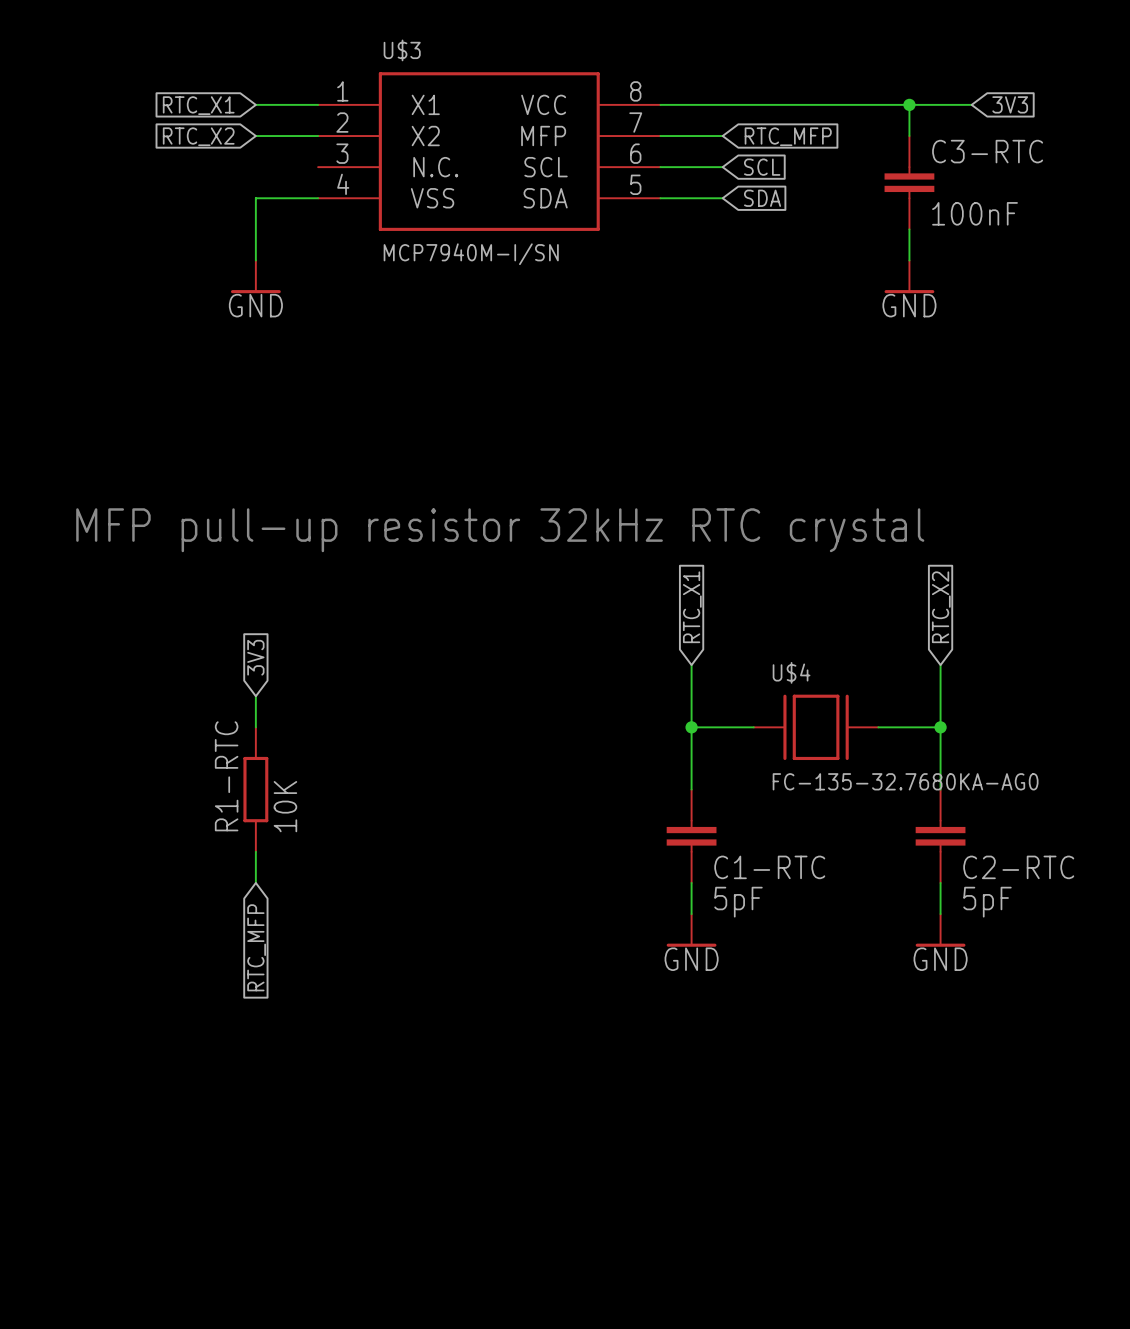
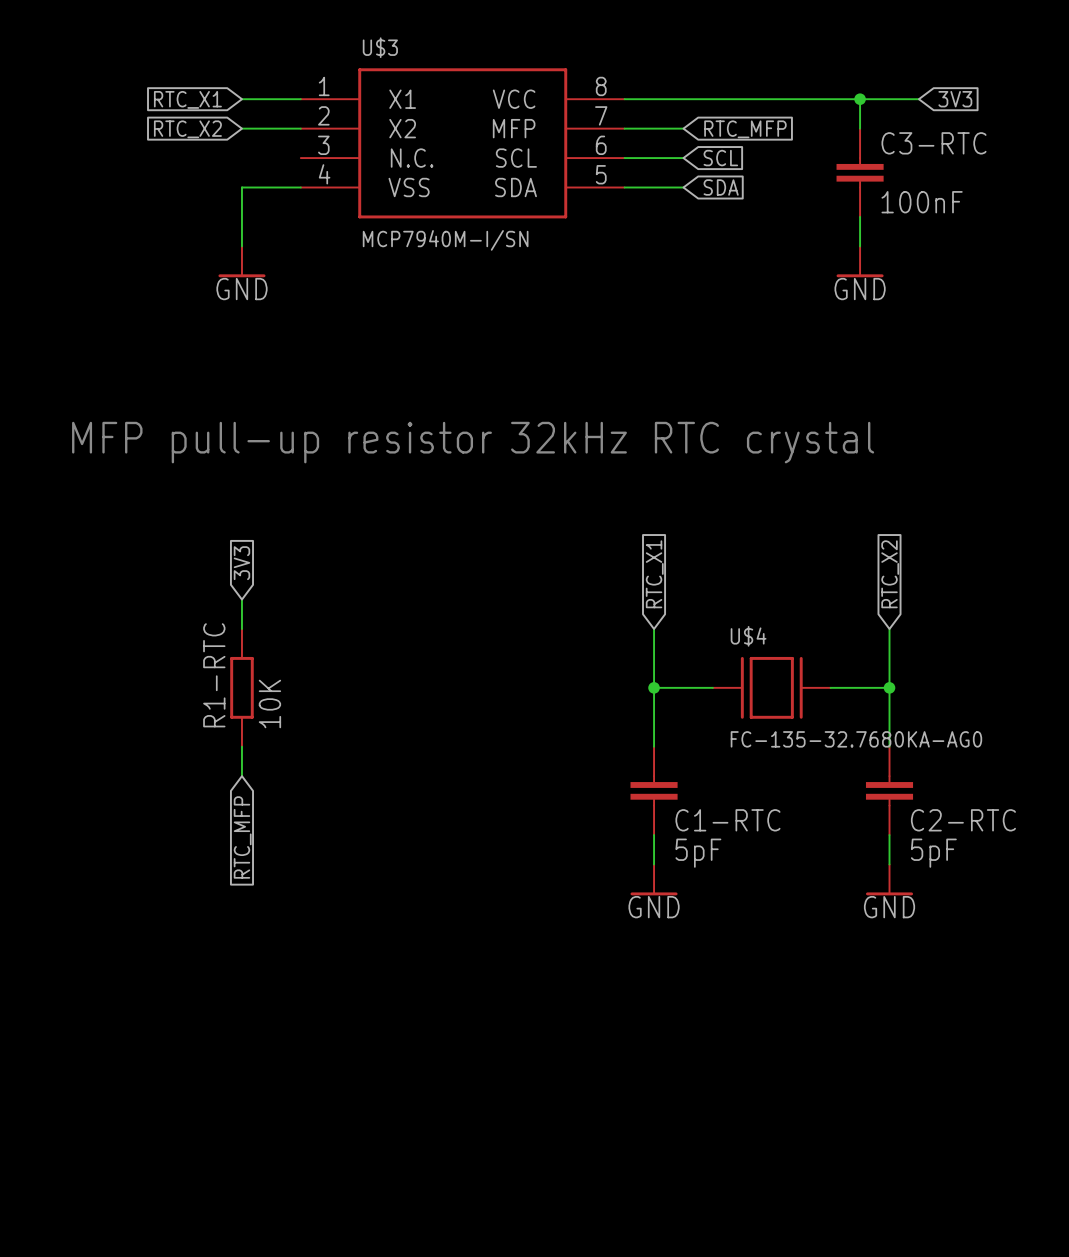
text position: MFP pull-up resistor (298, 530) -> MFP pull-up resistor (282, 442)
text position: 32kHz RTC crystal (732, 530) -> 32kHz RTC crystal (692, 442)
global label position: 3V3 (255, 657) -> 3V3 (241, 563)
wire: (255, 696) (255, 727) -> (241, 599) (241, 628)
R1-RTC position: (255, 789) -> (241, 687)
wire: (255, 851) (255, 882) -> (241, 746) (241, 776)
global label position: RTC_MFP (256, 947) -> RTC_MFP (242, 837)

